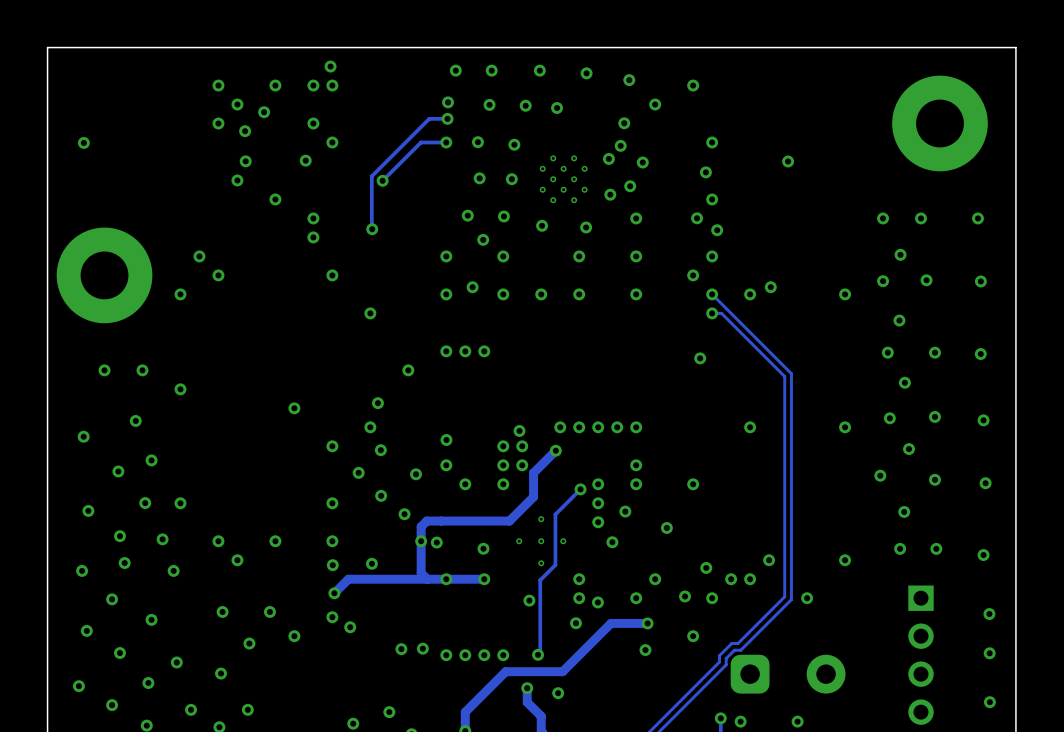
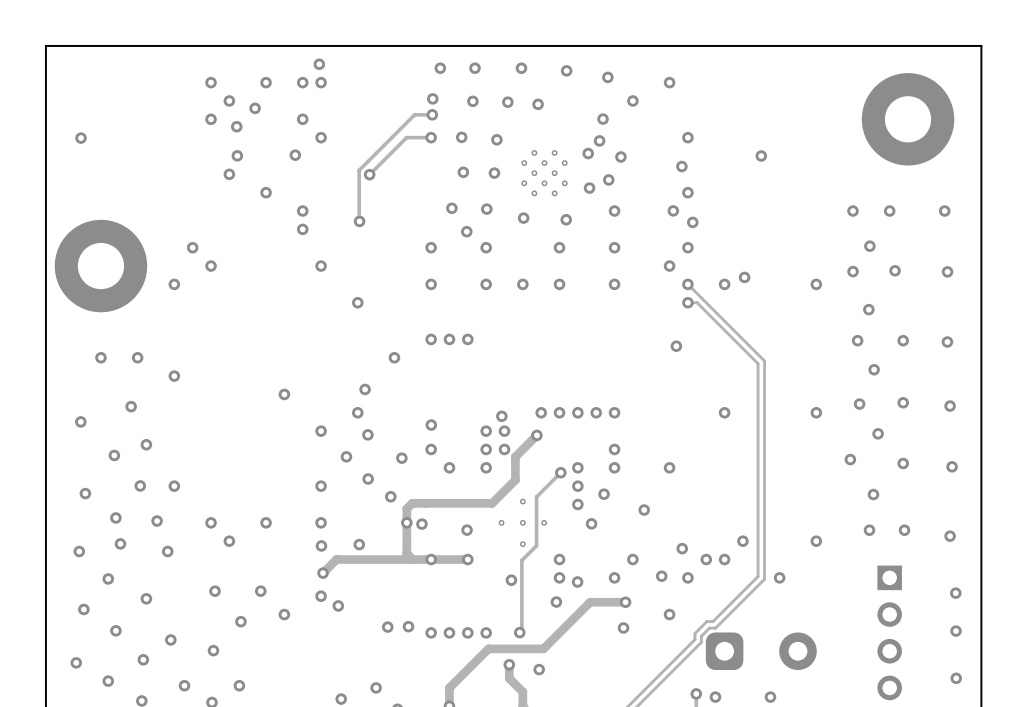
via: (472, 287) -> none

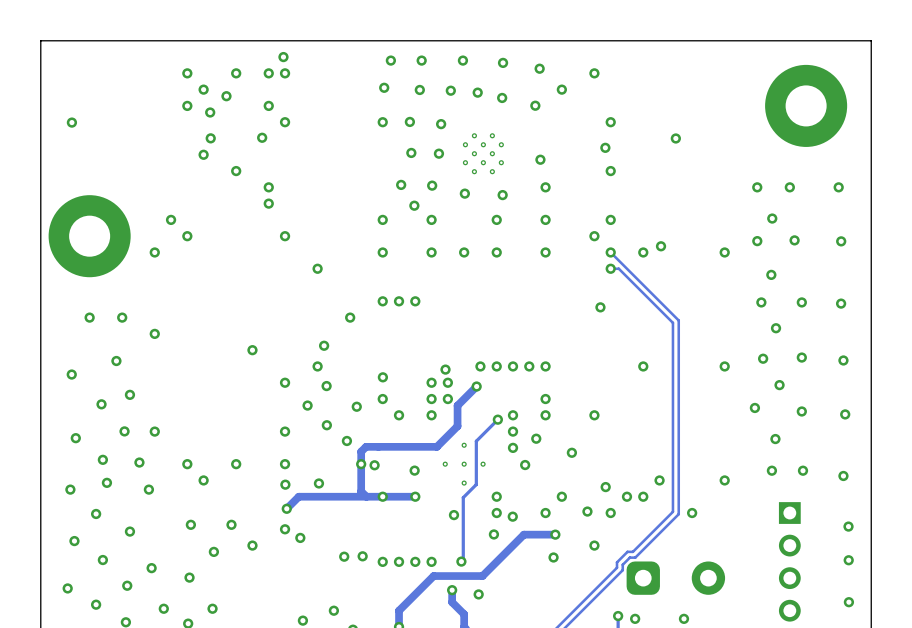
via: none -> (502, 97)
track: (432, 114) (414, 114) (359, 170) (359, 221) -> none
via: (432, 114) -> none
track: (431, 137) (406, 137) (369, 174) -> none
via: (599, 140) -> none
via: (588, 153) -> none
via: (620, 156) -> none
via: (369, 174) -> none
via: (589, 188) -> none
via: (673, 210) -> none
via: (359, 221) -> none
via: (692, 222) -> none

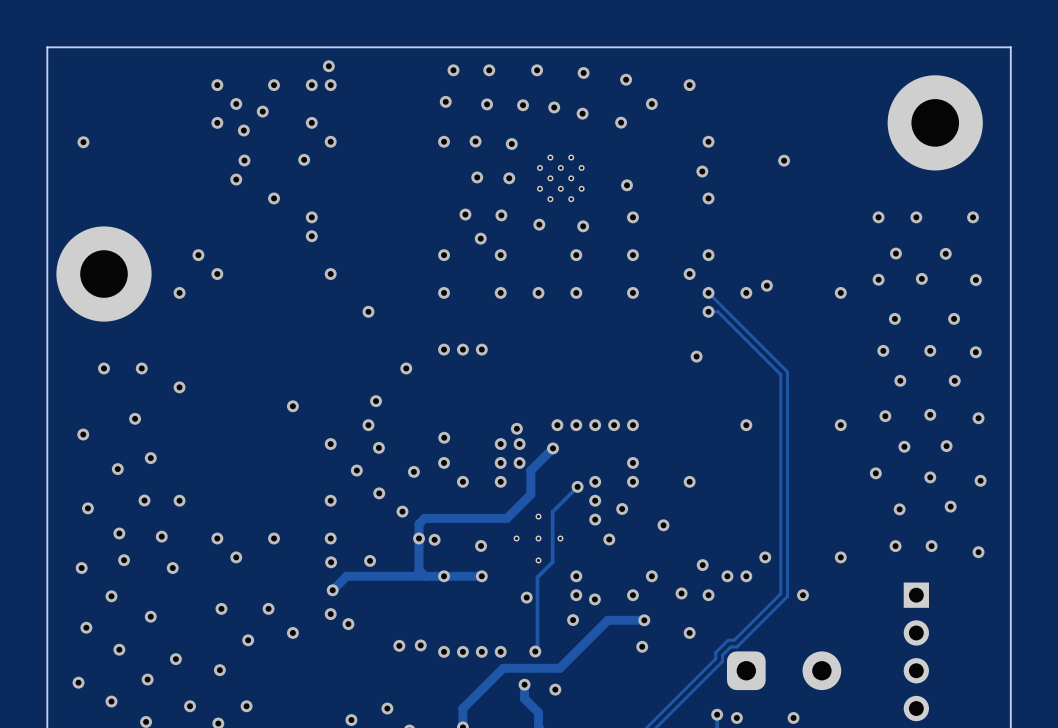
via: none -> (945, 253)
via: none -> (954, 318)
via: none -> (954, 380)
via: none -> (946, 446)
via: none -> (950, 506)
via: (848, 526) -> none
via: (848, 560) -> none
via: (848, 602) -> none

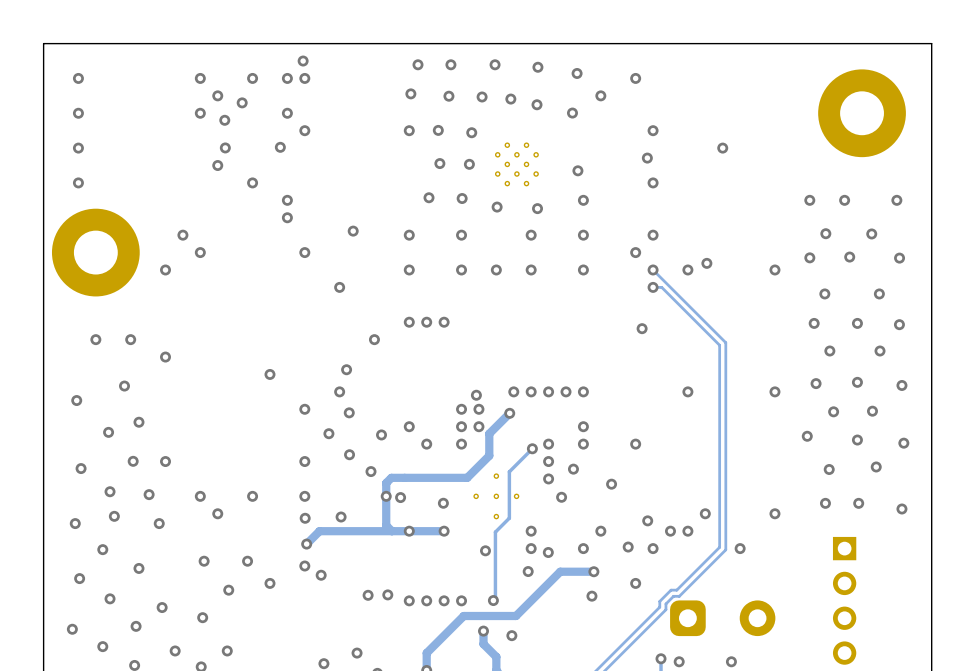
via: none -> (78, 78)
via: none -> (78, 113)
via: (83, 142) -> none
via: none -> (78, 148)
via: none -> (78, 182)
via: (480, 238) -> none
via: none -> (353, 231)
via: (444, 437) -> none

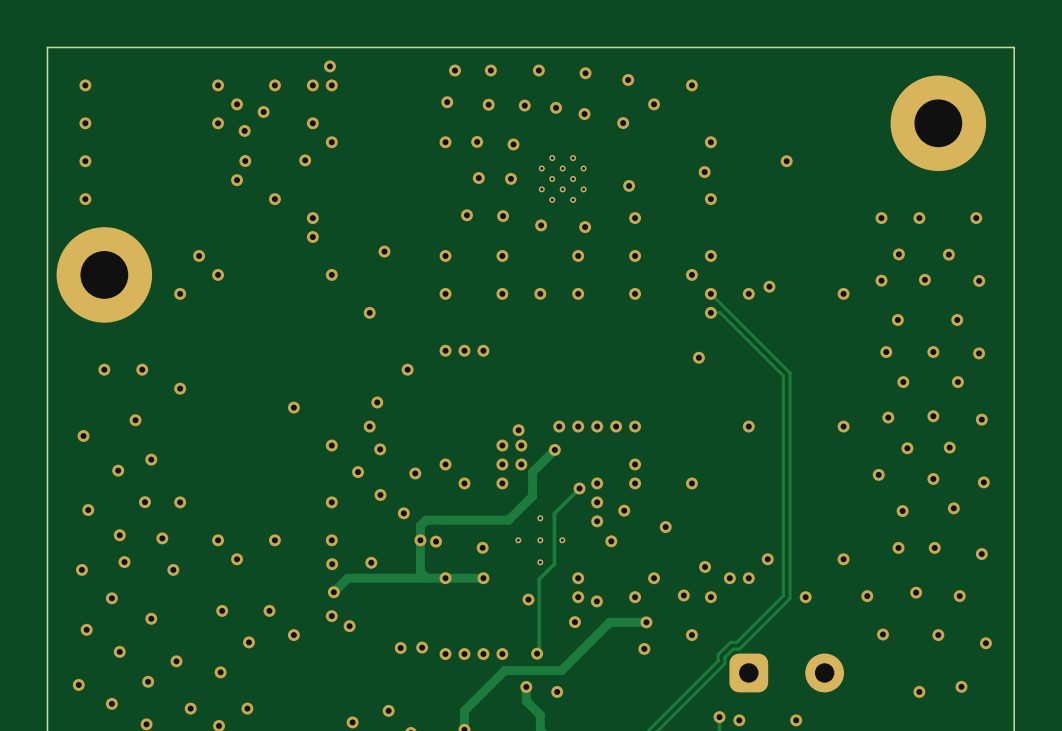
via: none -> (916, 592)
via: none -> (867, 596)
via: none -> (959, 596)
via: none -> (882, 634)
via: none -> (938, 635)
via: none -> (985, 643)
part: (844, 600) -> none
via: none -> (961, 686)
via: none -> (919, 691)

